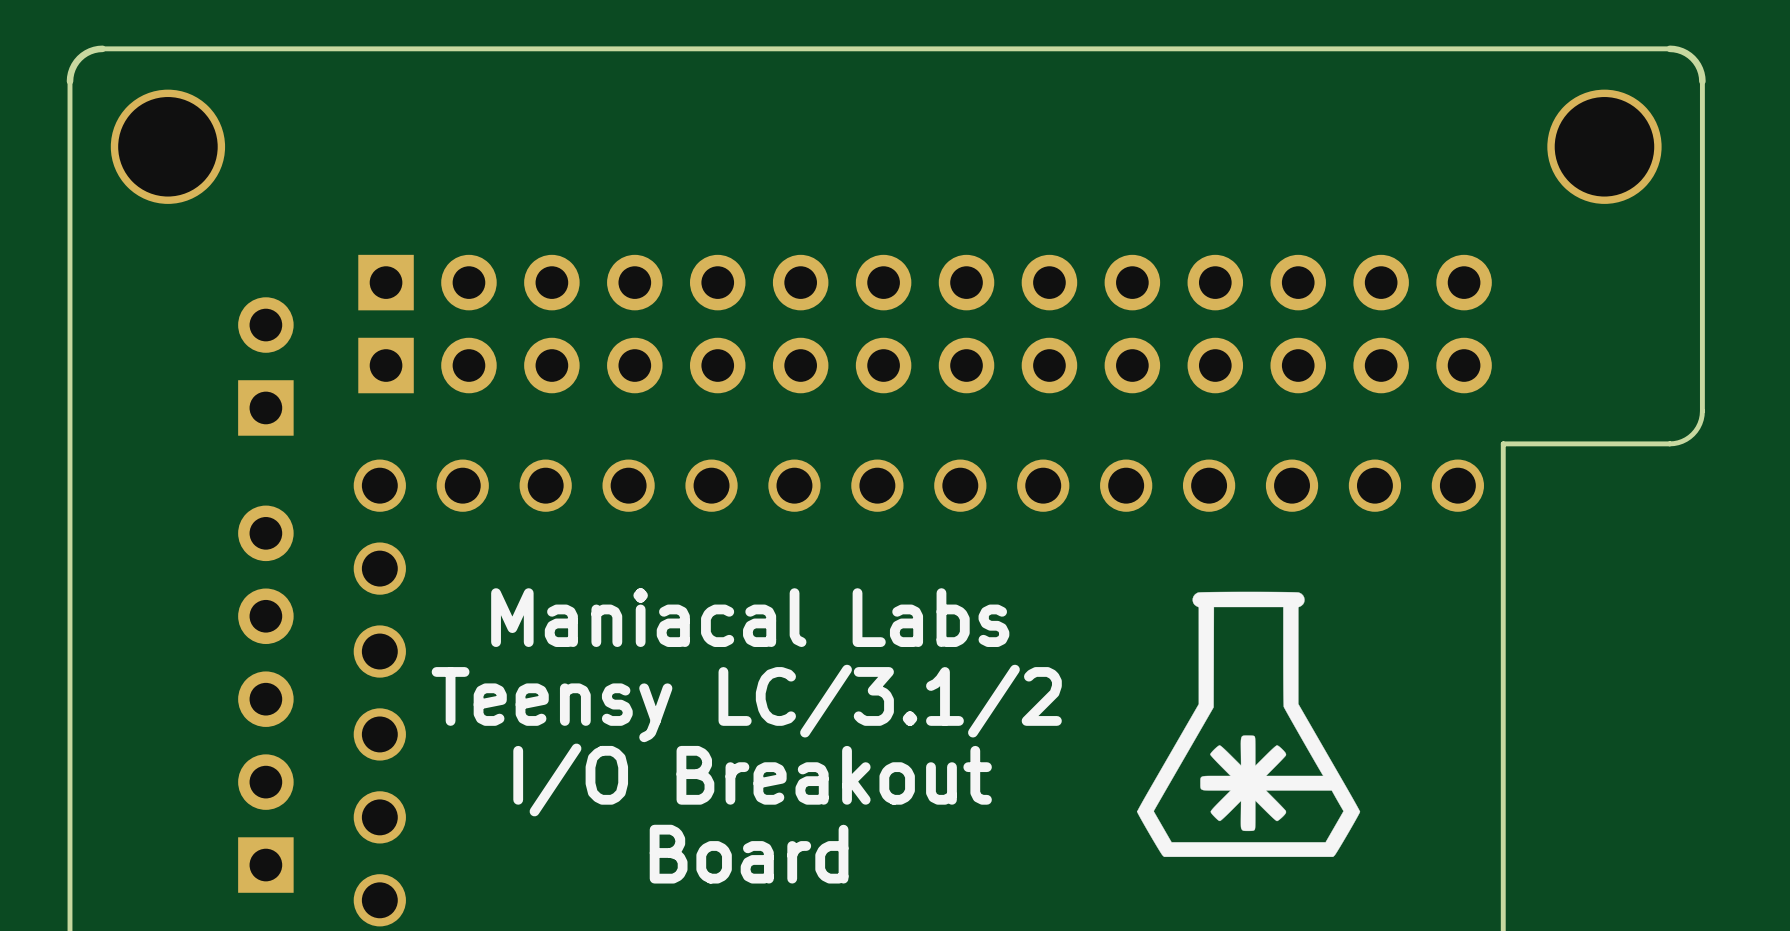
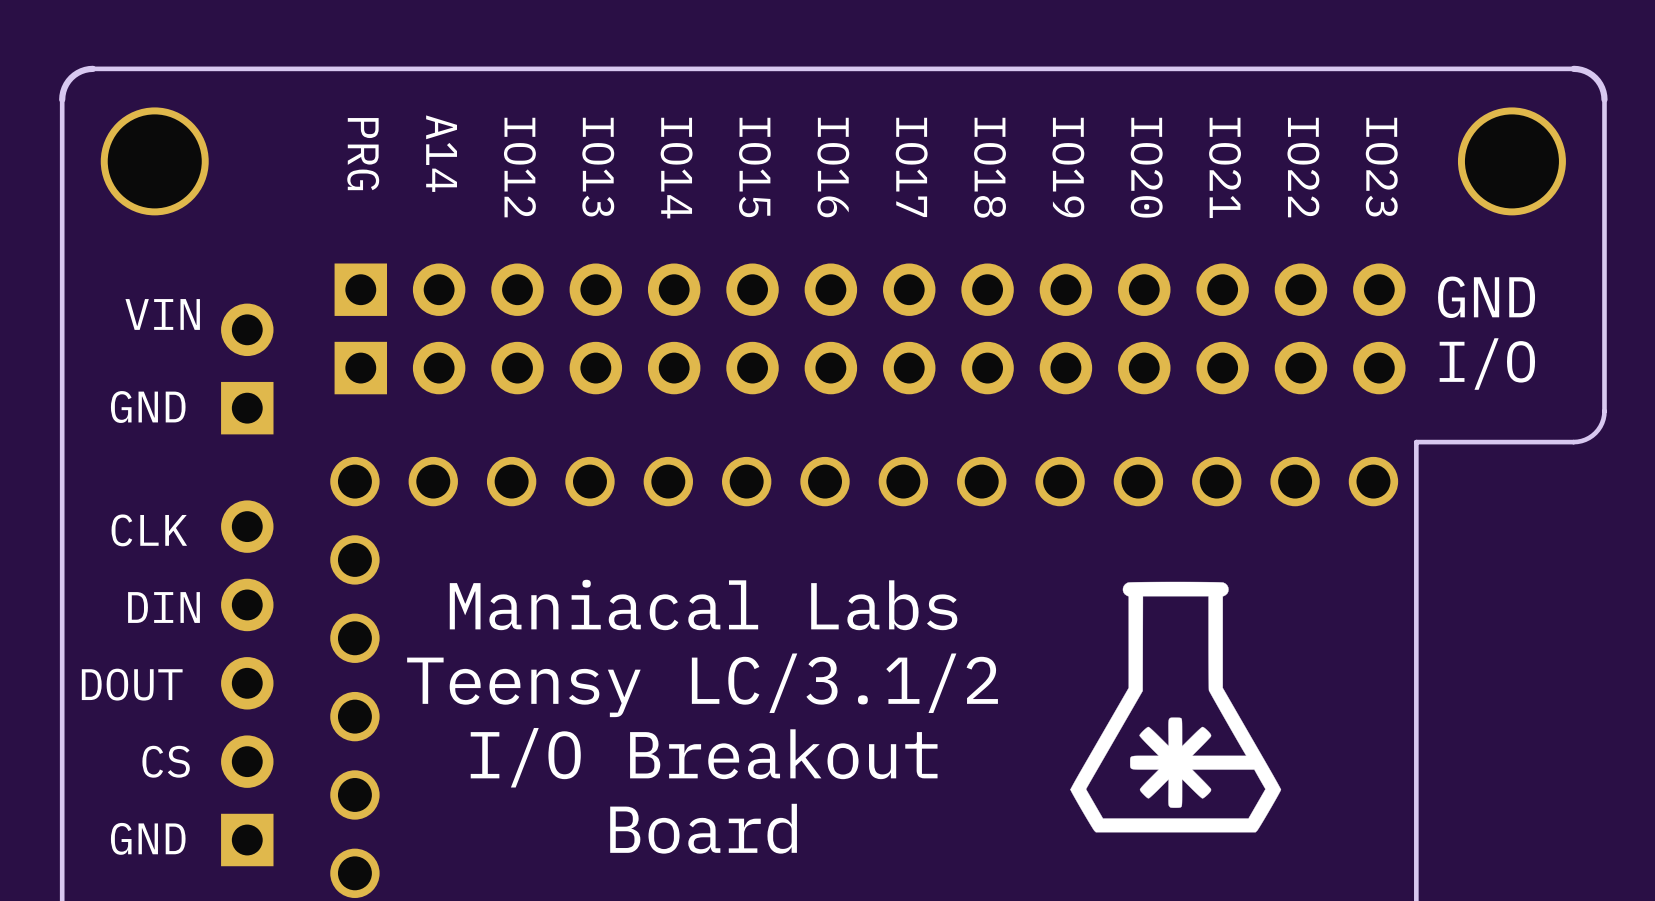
text: none -> A14 (441, 153)
text: none -> PRG (363, 154)
text: none -> IO12 (519, 167)
text: none -> IO13 (598, 167)
text: none -> IO14 (676, 168)
text: none -> IO15 (754, 167)
text: none -> IO16 (833, 167)
text: none -> IO17 (911, 167)
text: none -> IO18 (990, 167)
text: none -> IO19 (1068, 167)
text: none -> IO20 (1146, 167)
text: none -> IO21 (1225, 167)
text: none -> IO22 (1303, 167)
text: none -> IO23 (1381, 167)
text: none -> GND (1486, 297)
text: none -> VIN (162, 314)
text: none -> I/O (1487, 364)
text: none -> GND (148, 407)
text: none -> CLK (149, 530)
text: none -> DIN (164, 607)
text: none -> DOUT (132, 684)
text: none -> CS (166, 761)
text: none -> GND (148, 838)

